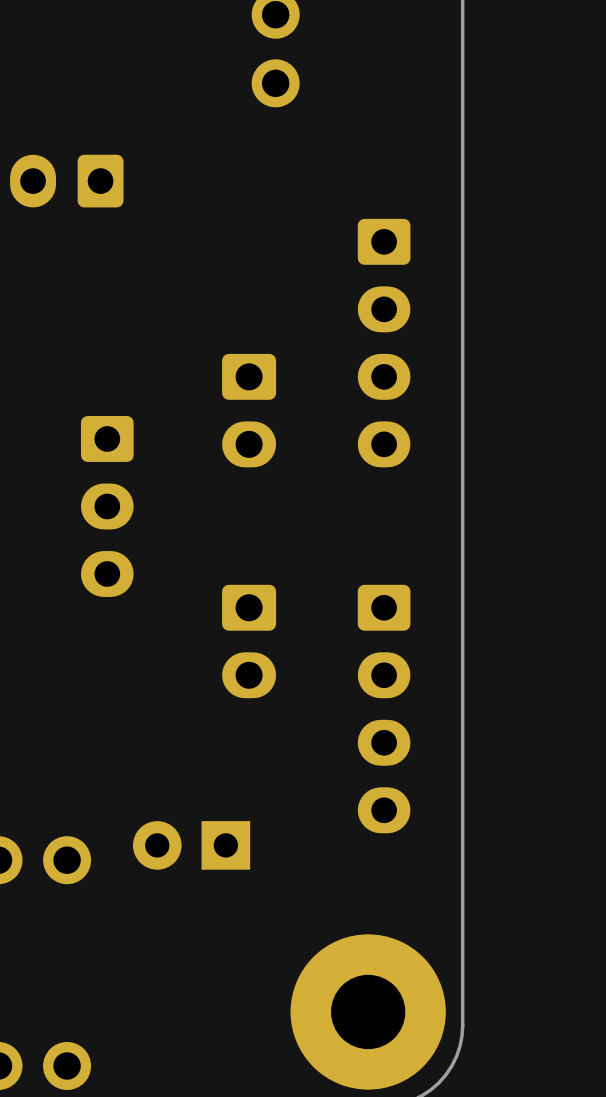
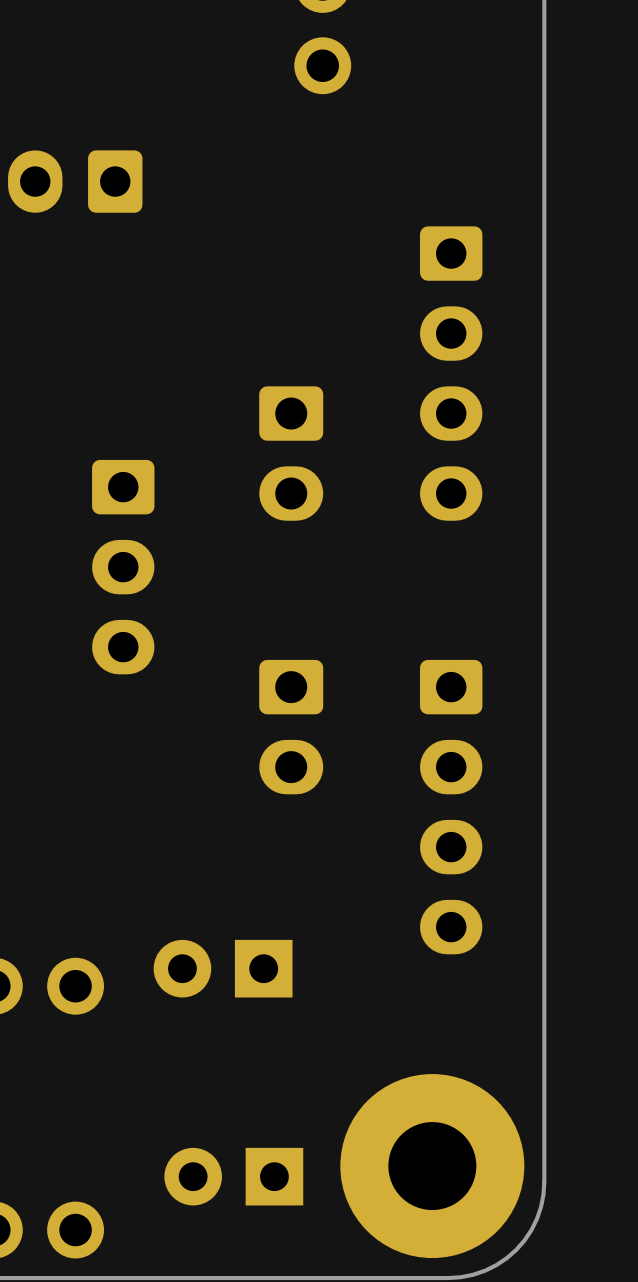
part: none -> (233, 1176)

